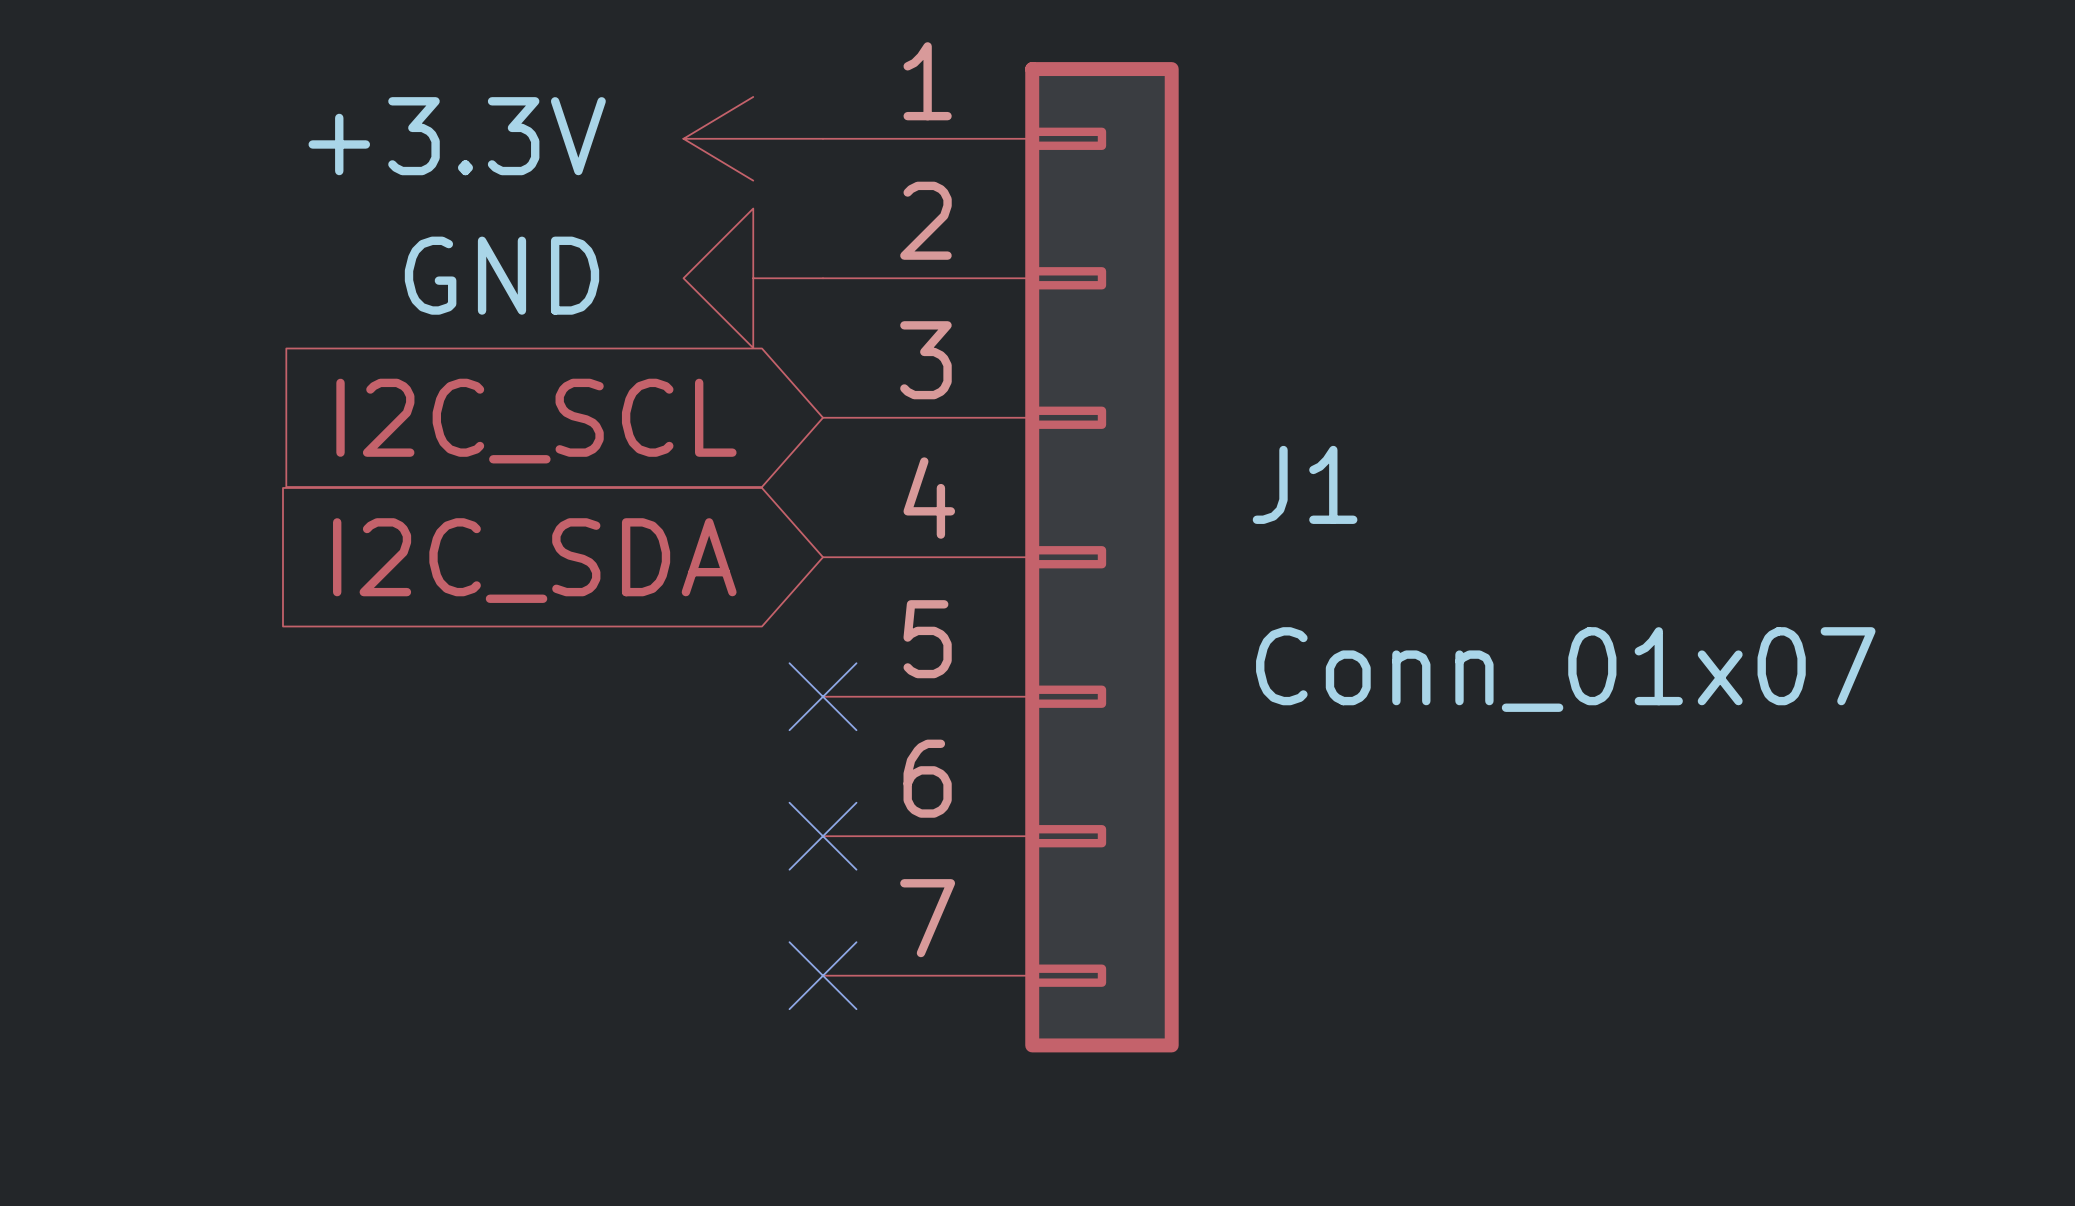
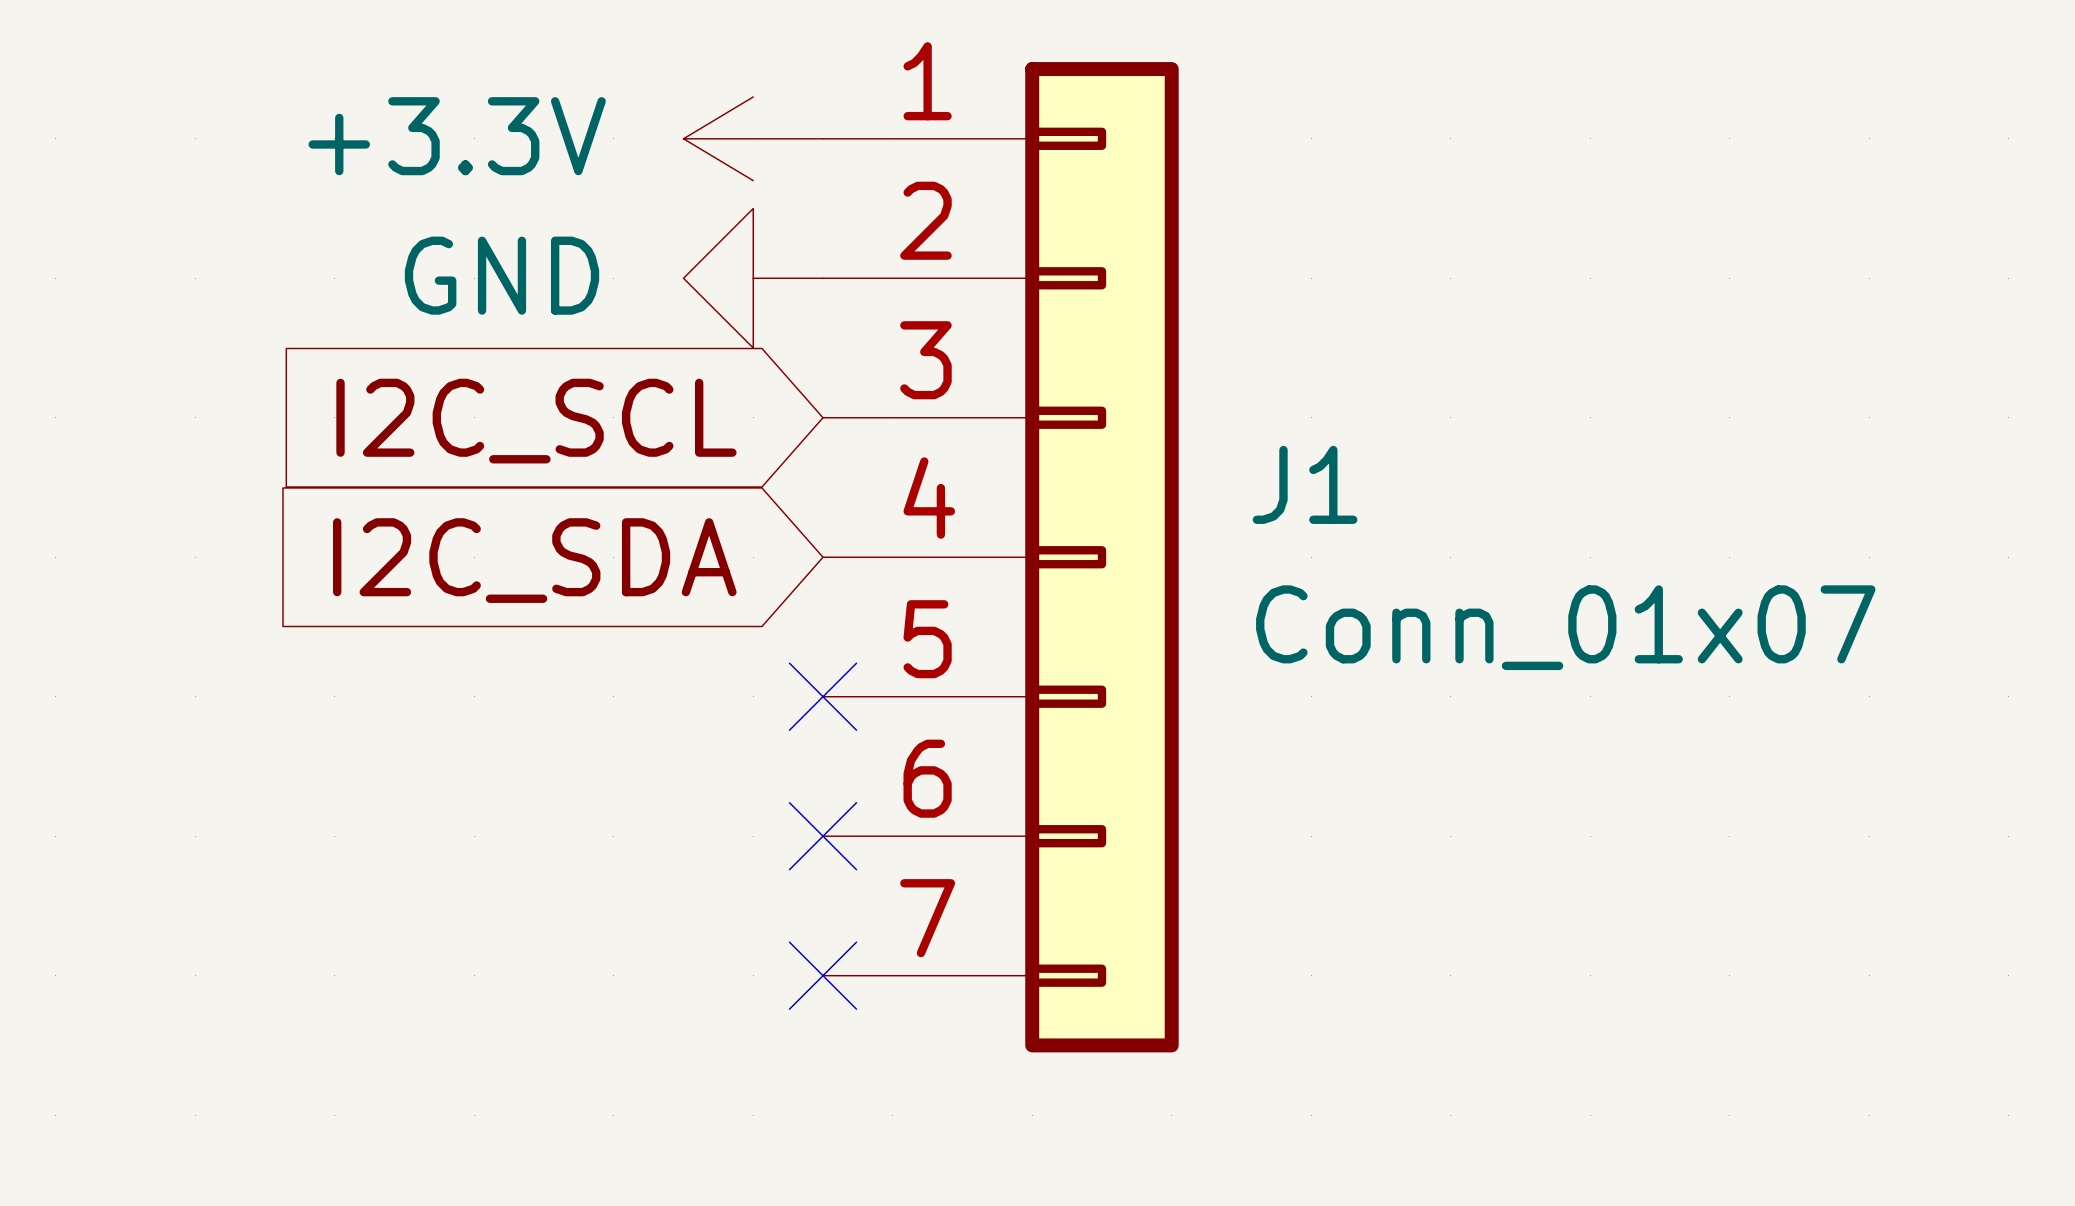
J1 value position: Conn_01x07 (1565, 669) -> Conn_01x07 (1565, 627)

